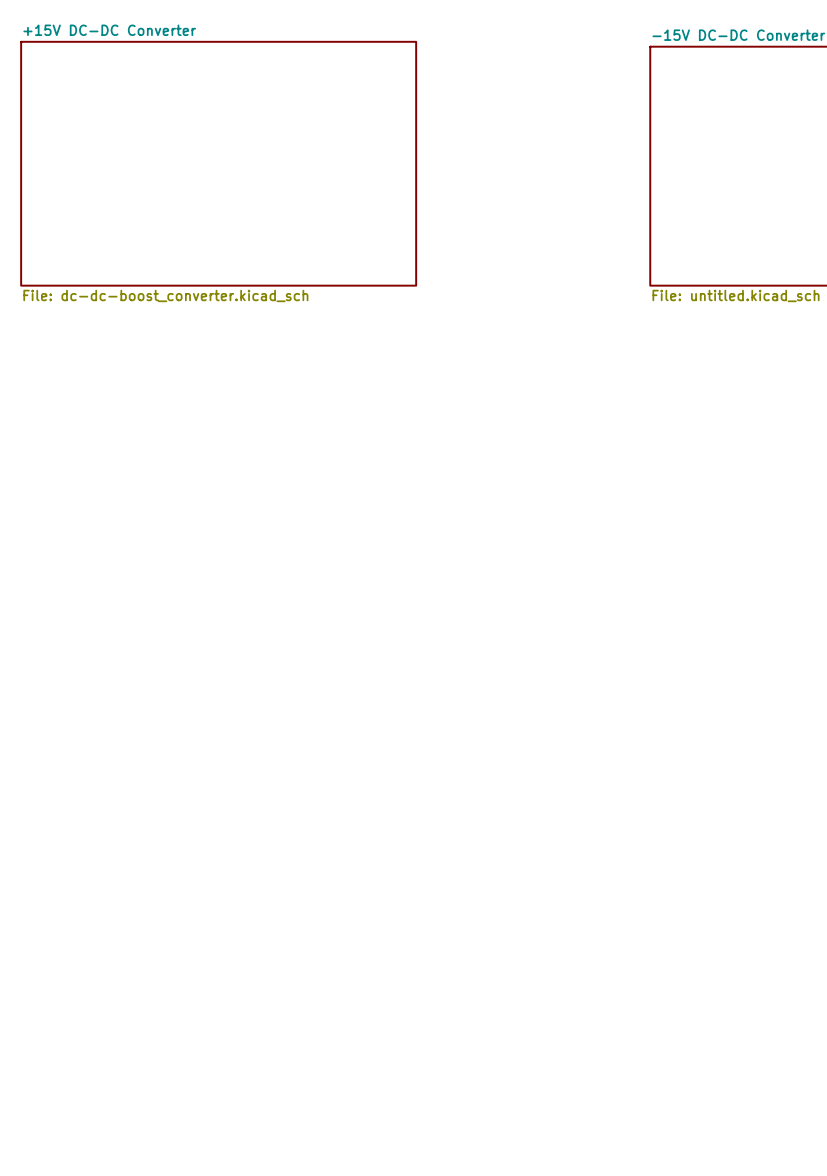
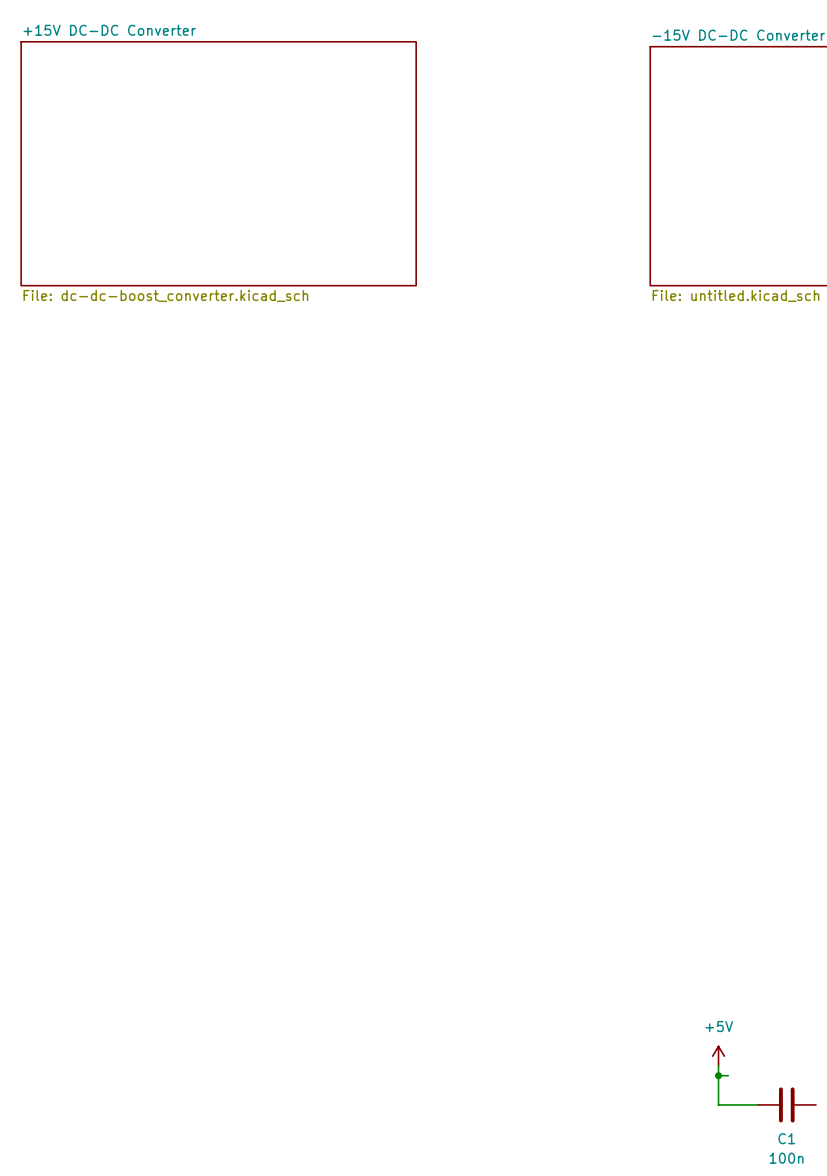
power symbol: none -> +5V (718, 1056)
wire: none -> (718, 1065) (718, 1104) (757, 1104)
wire: none -> (718, 1075) (728, 1075)
junction: none -> (718, 1075)
C1: none -> 100n (786, 1104)

